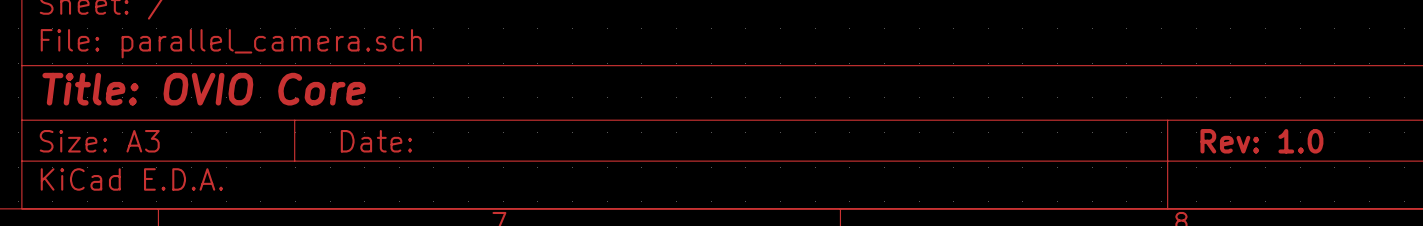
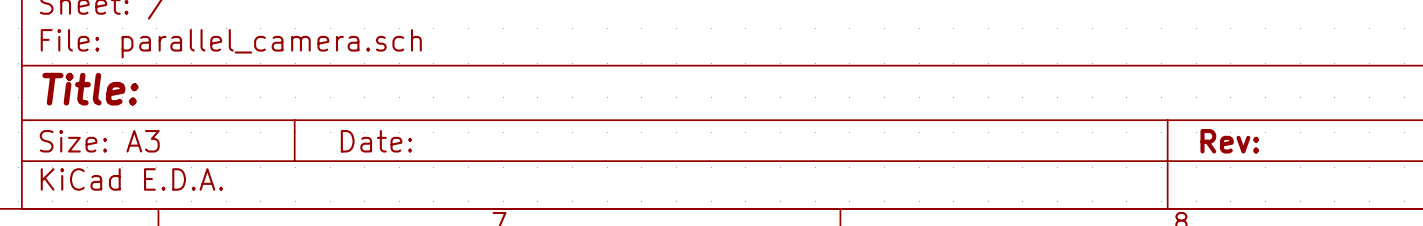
title block: Title: OVIO Core (204, 89) -> Title: (90, 89)
title block: Rev: 1.0 (1261, 141) -> Rev: (1229, 141)

